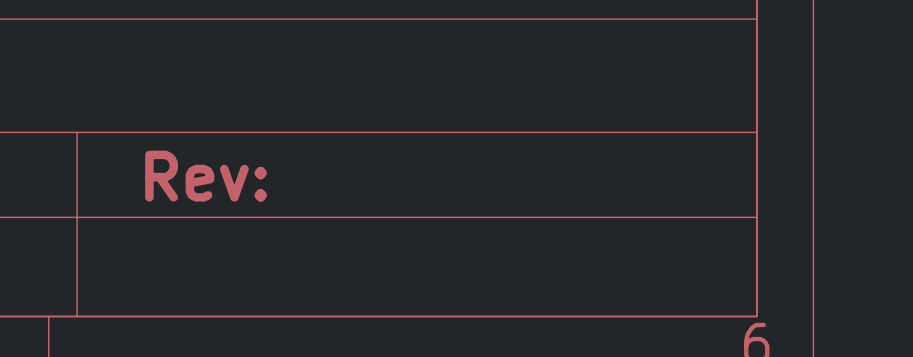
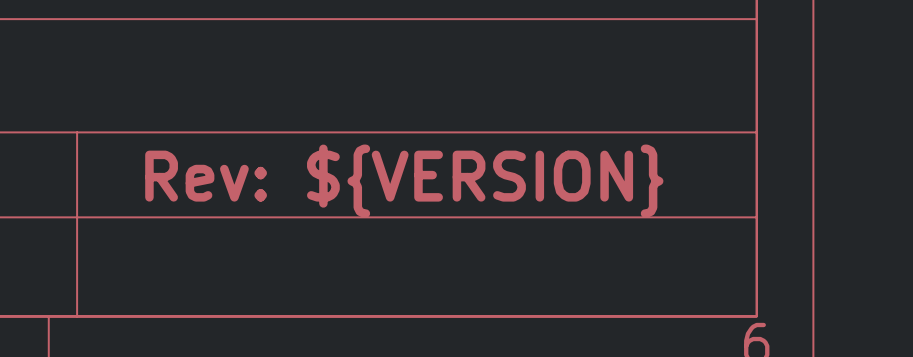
title block: Rev: (206, 176) -> Rev: ${VERSION} (404, 181)

